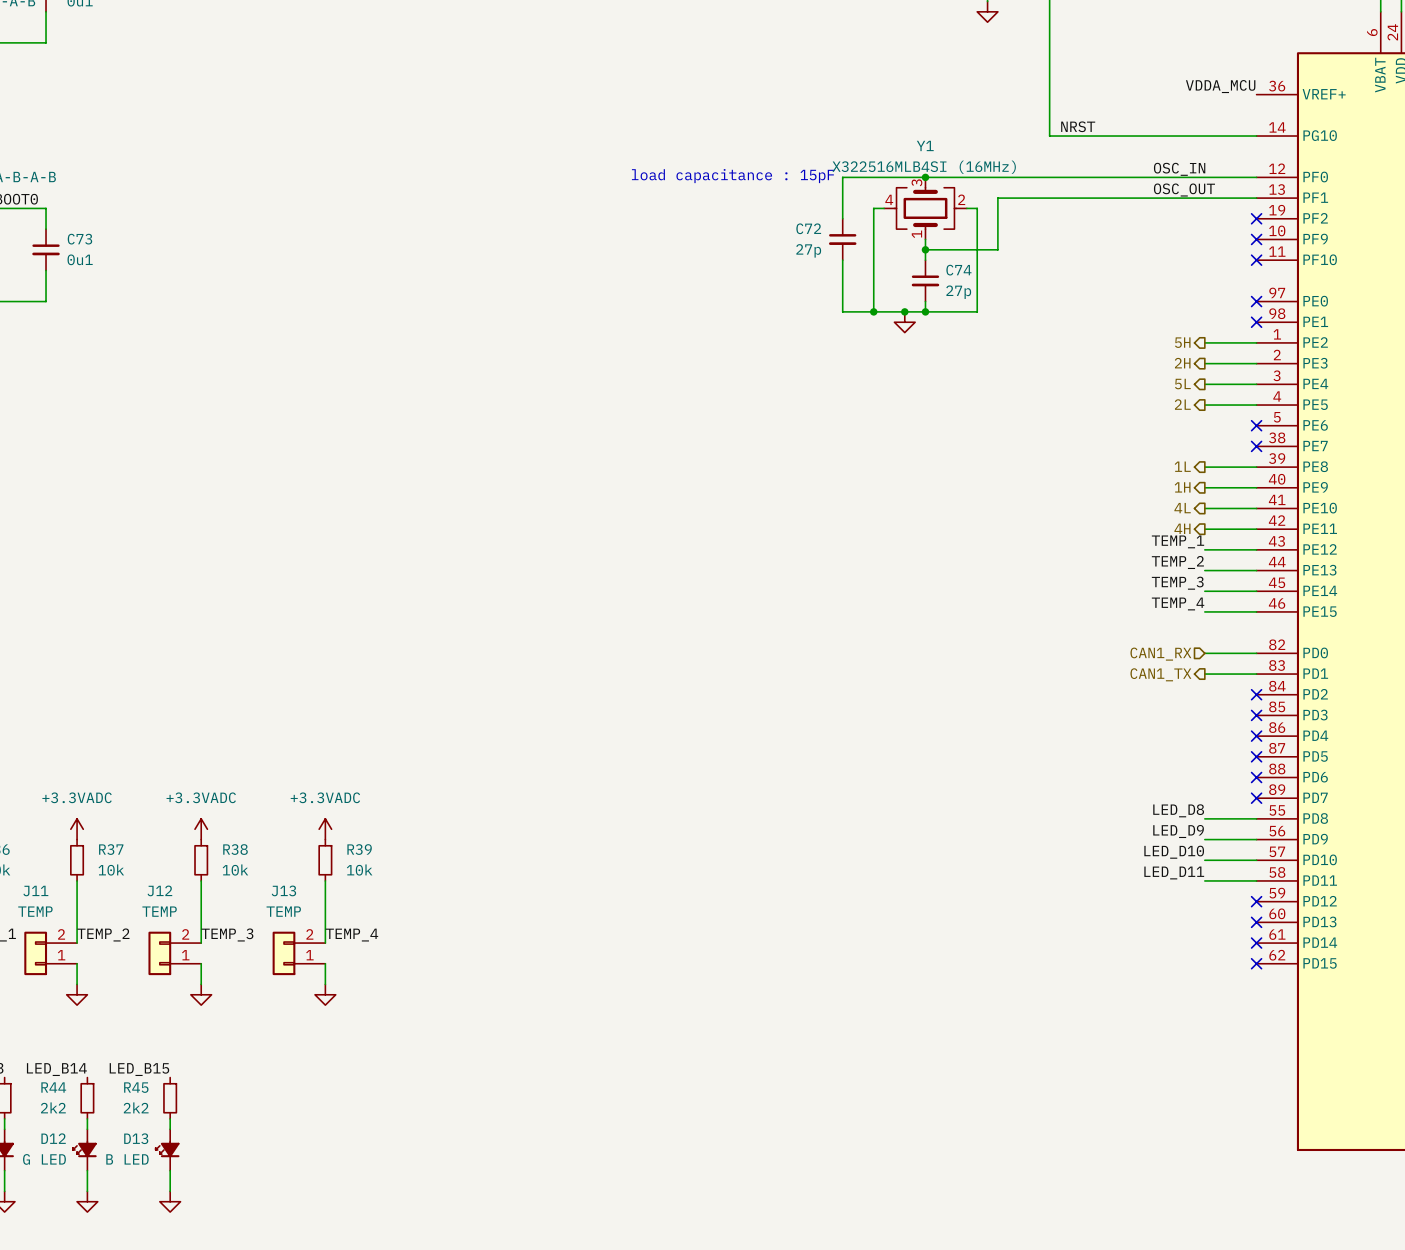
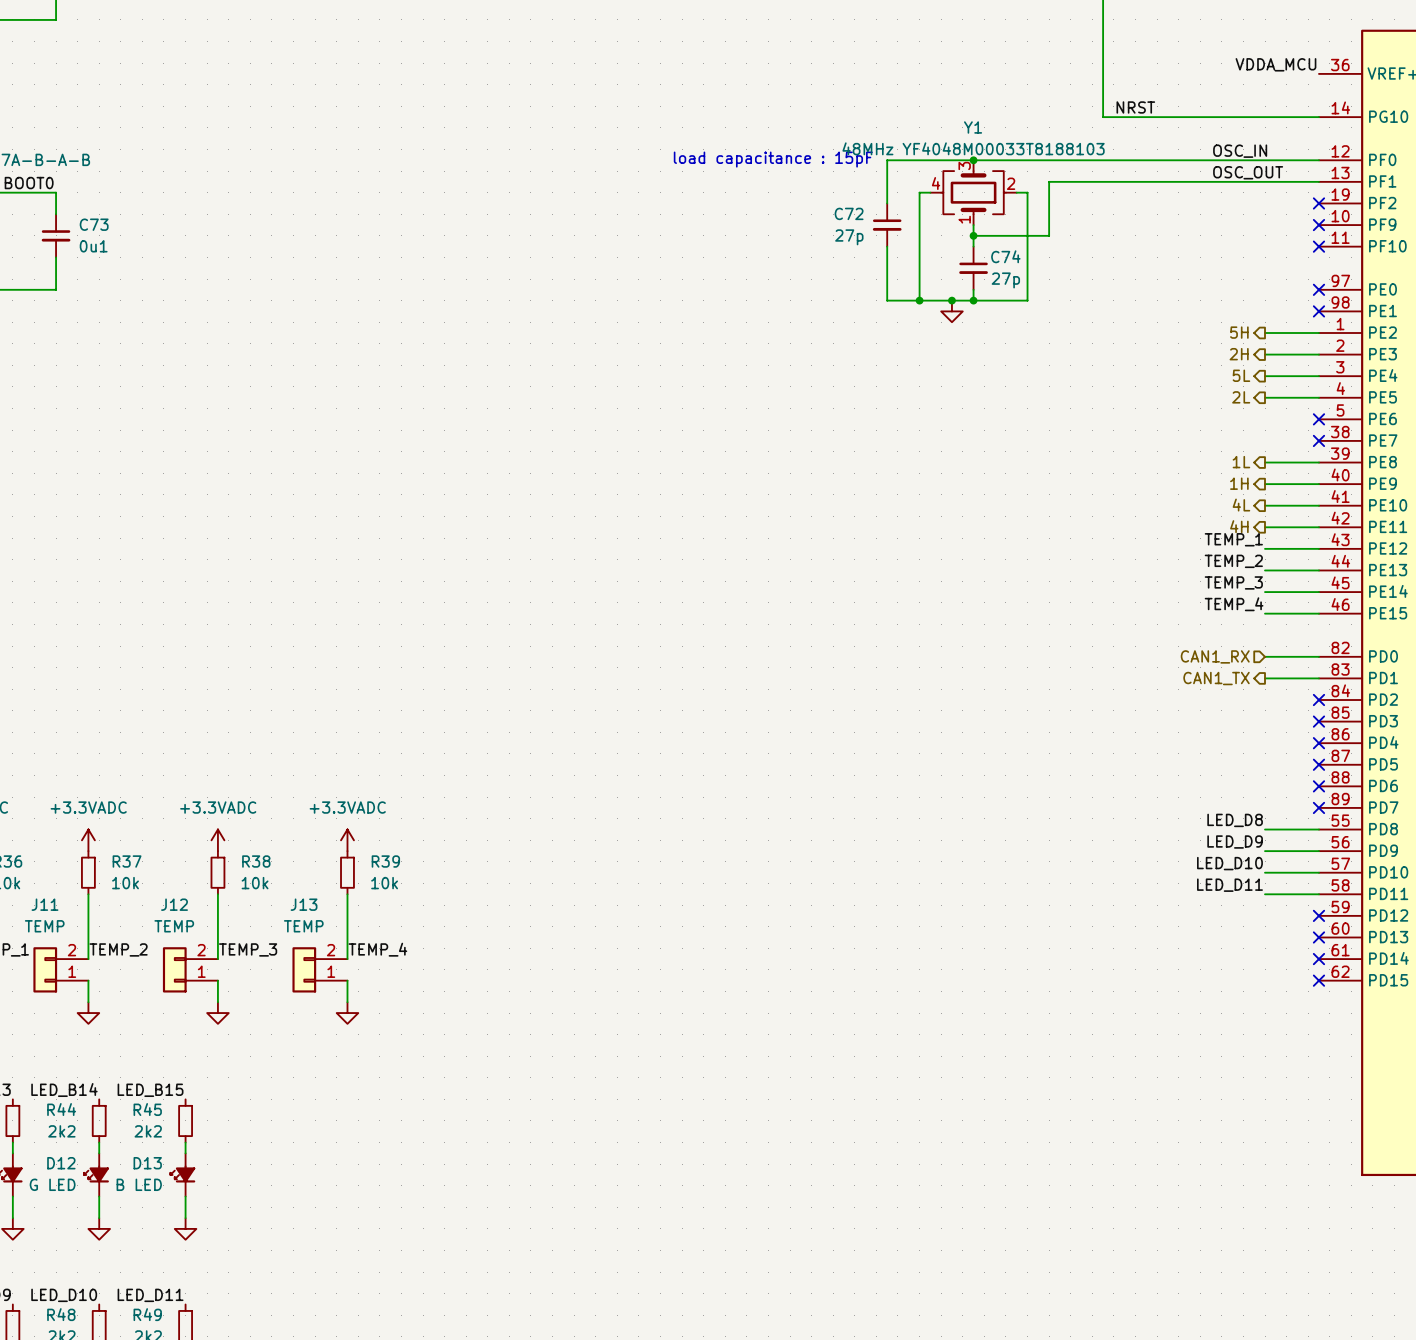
Y1 value: X322516MLB4SI (16MHz) (924, 167) -> 48MHz YF4048M00033T8188103 (973, 148)

